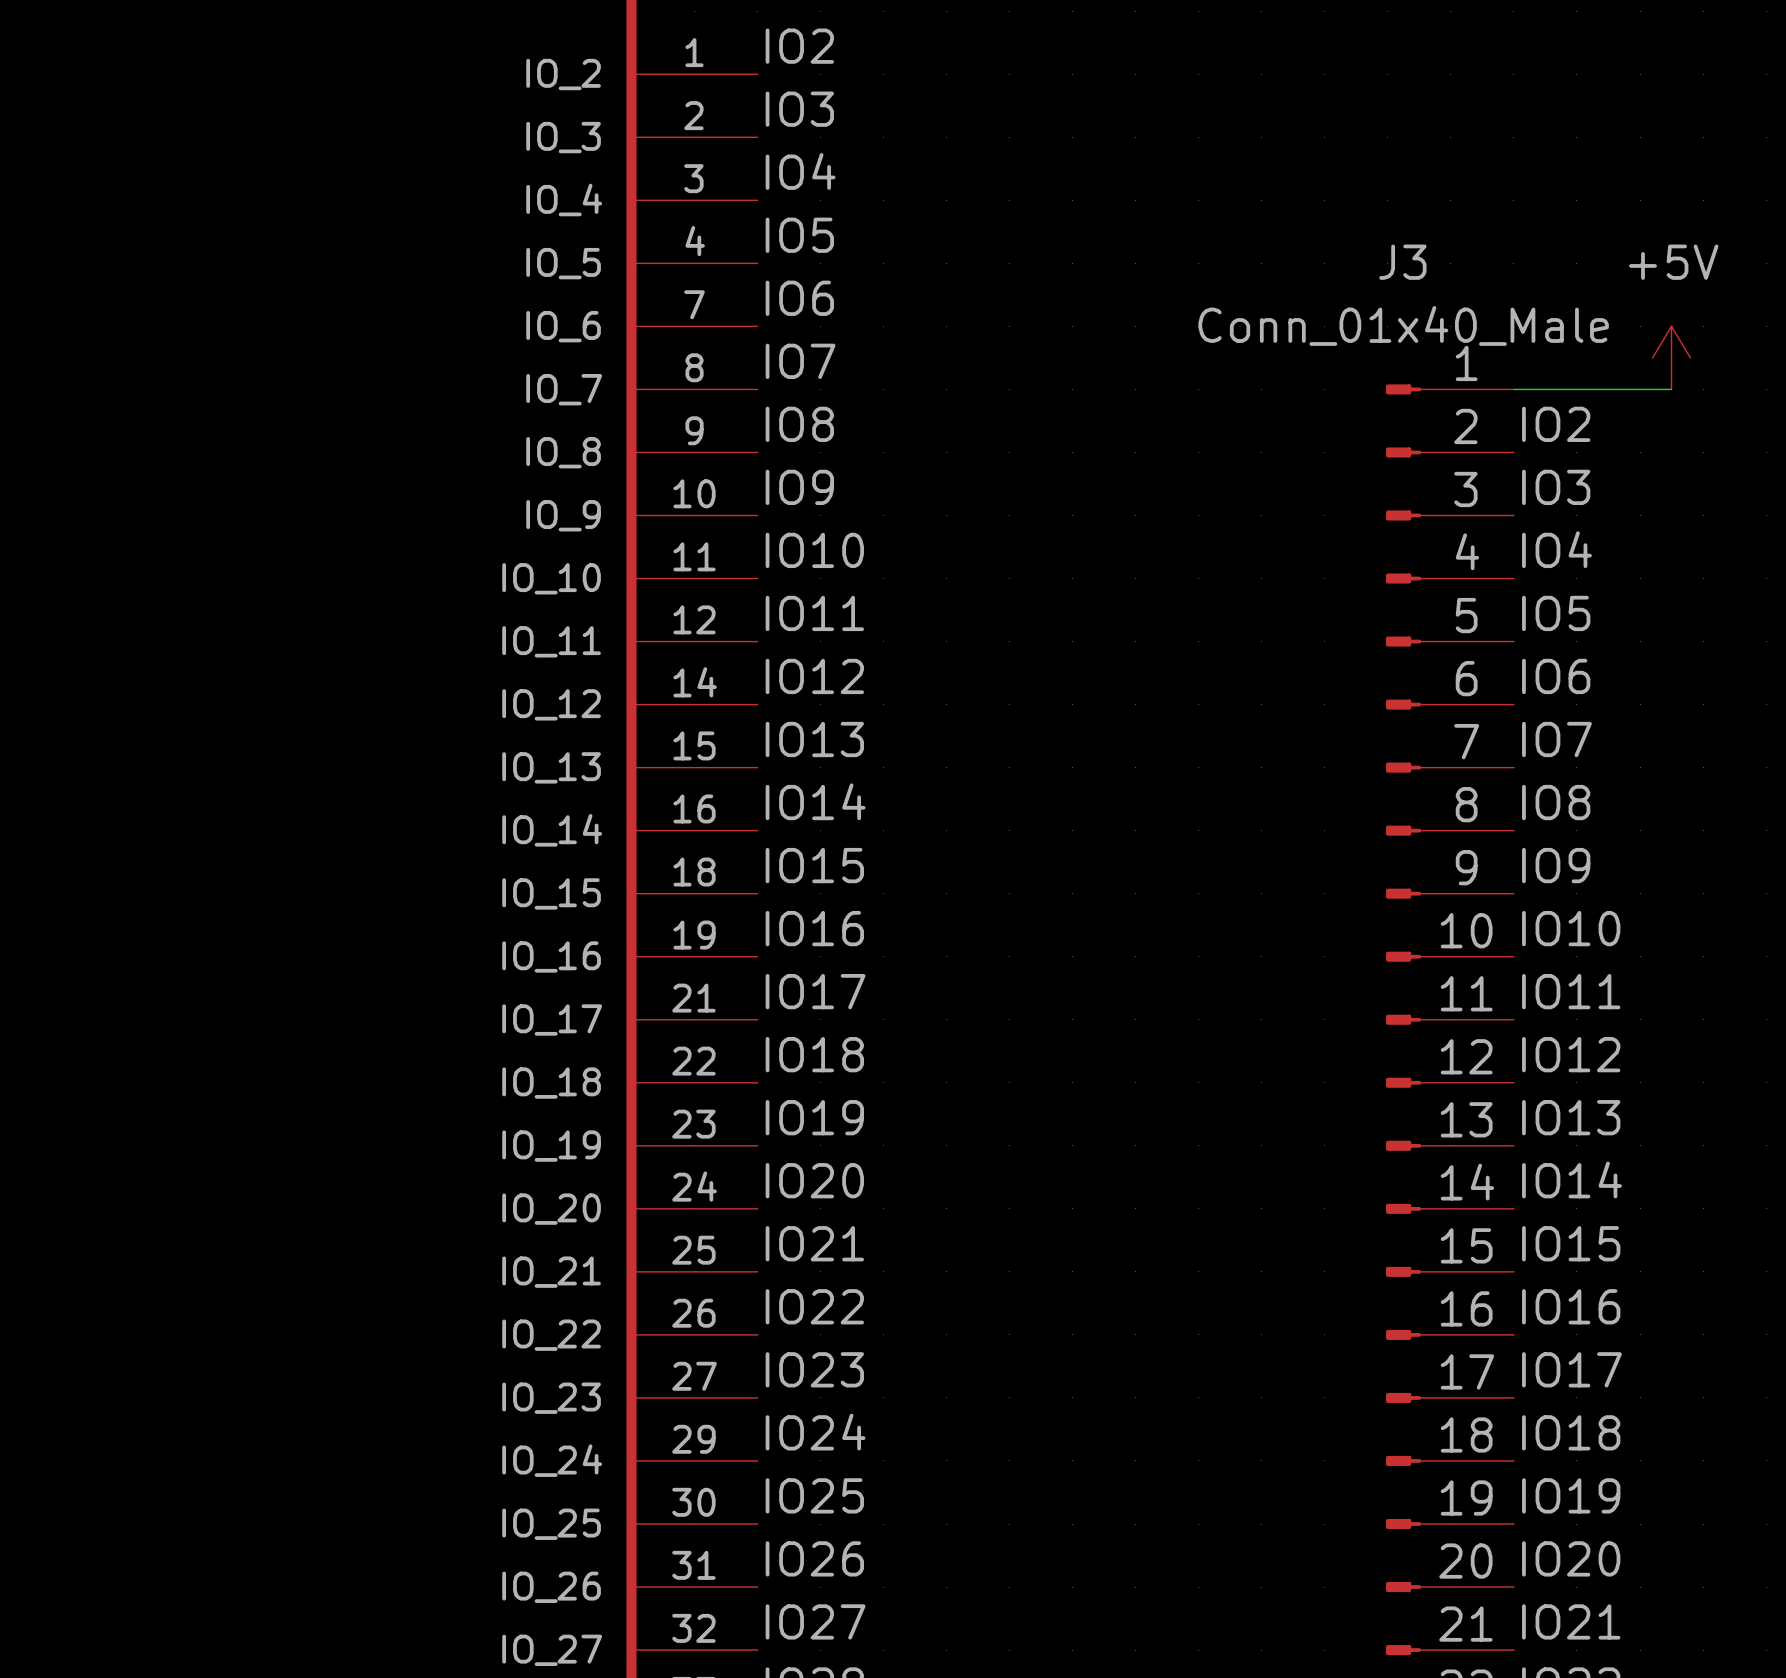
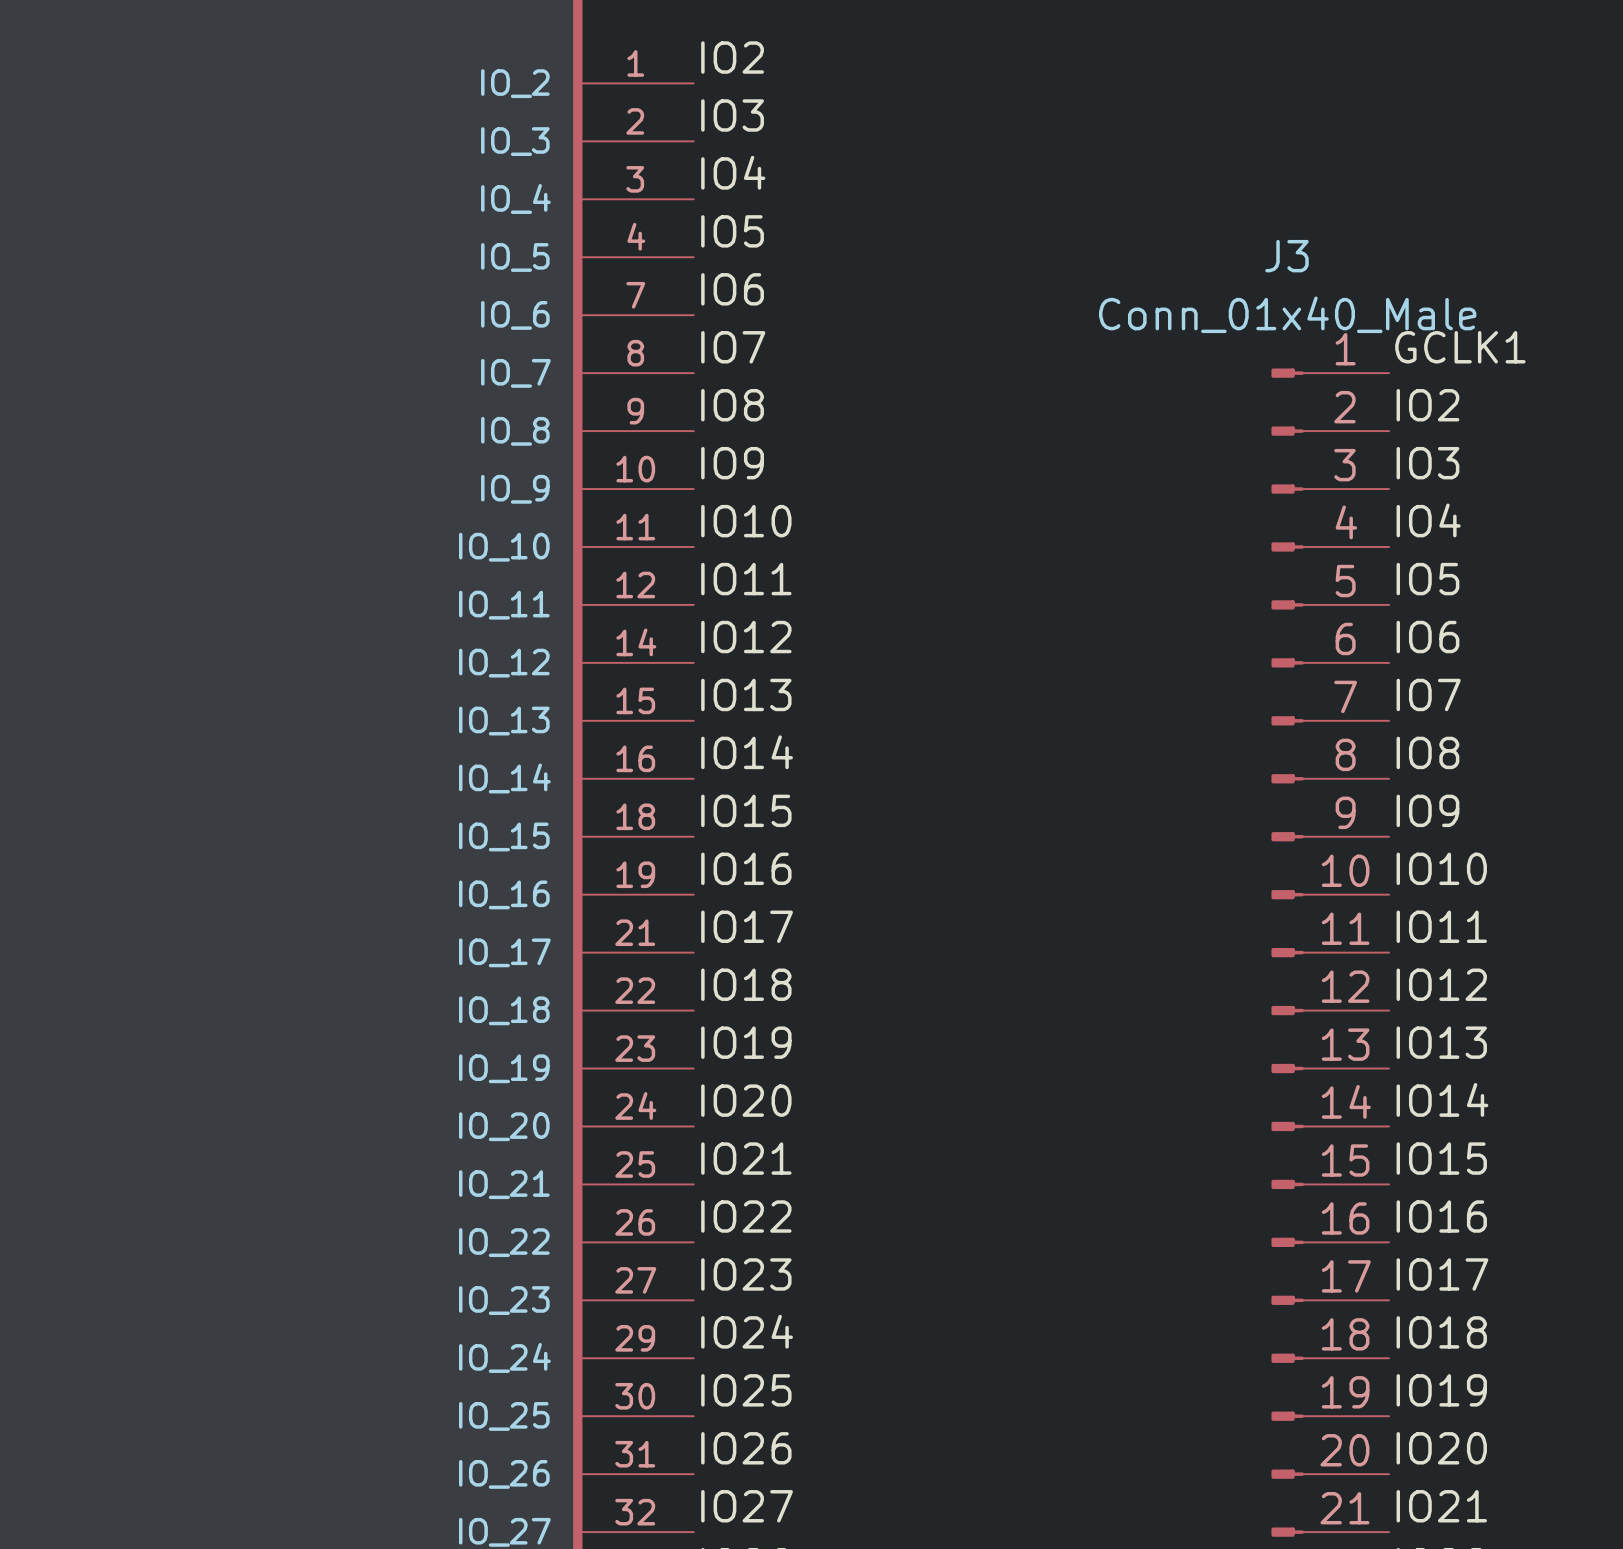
power symbol: +5V (1671, 357) -> none
label: none -> GCLK1 (1460, 347)
wire: (1513, 389) (1671, 389) -> none

